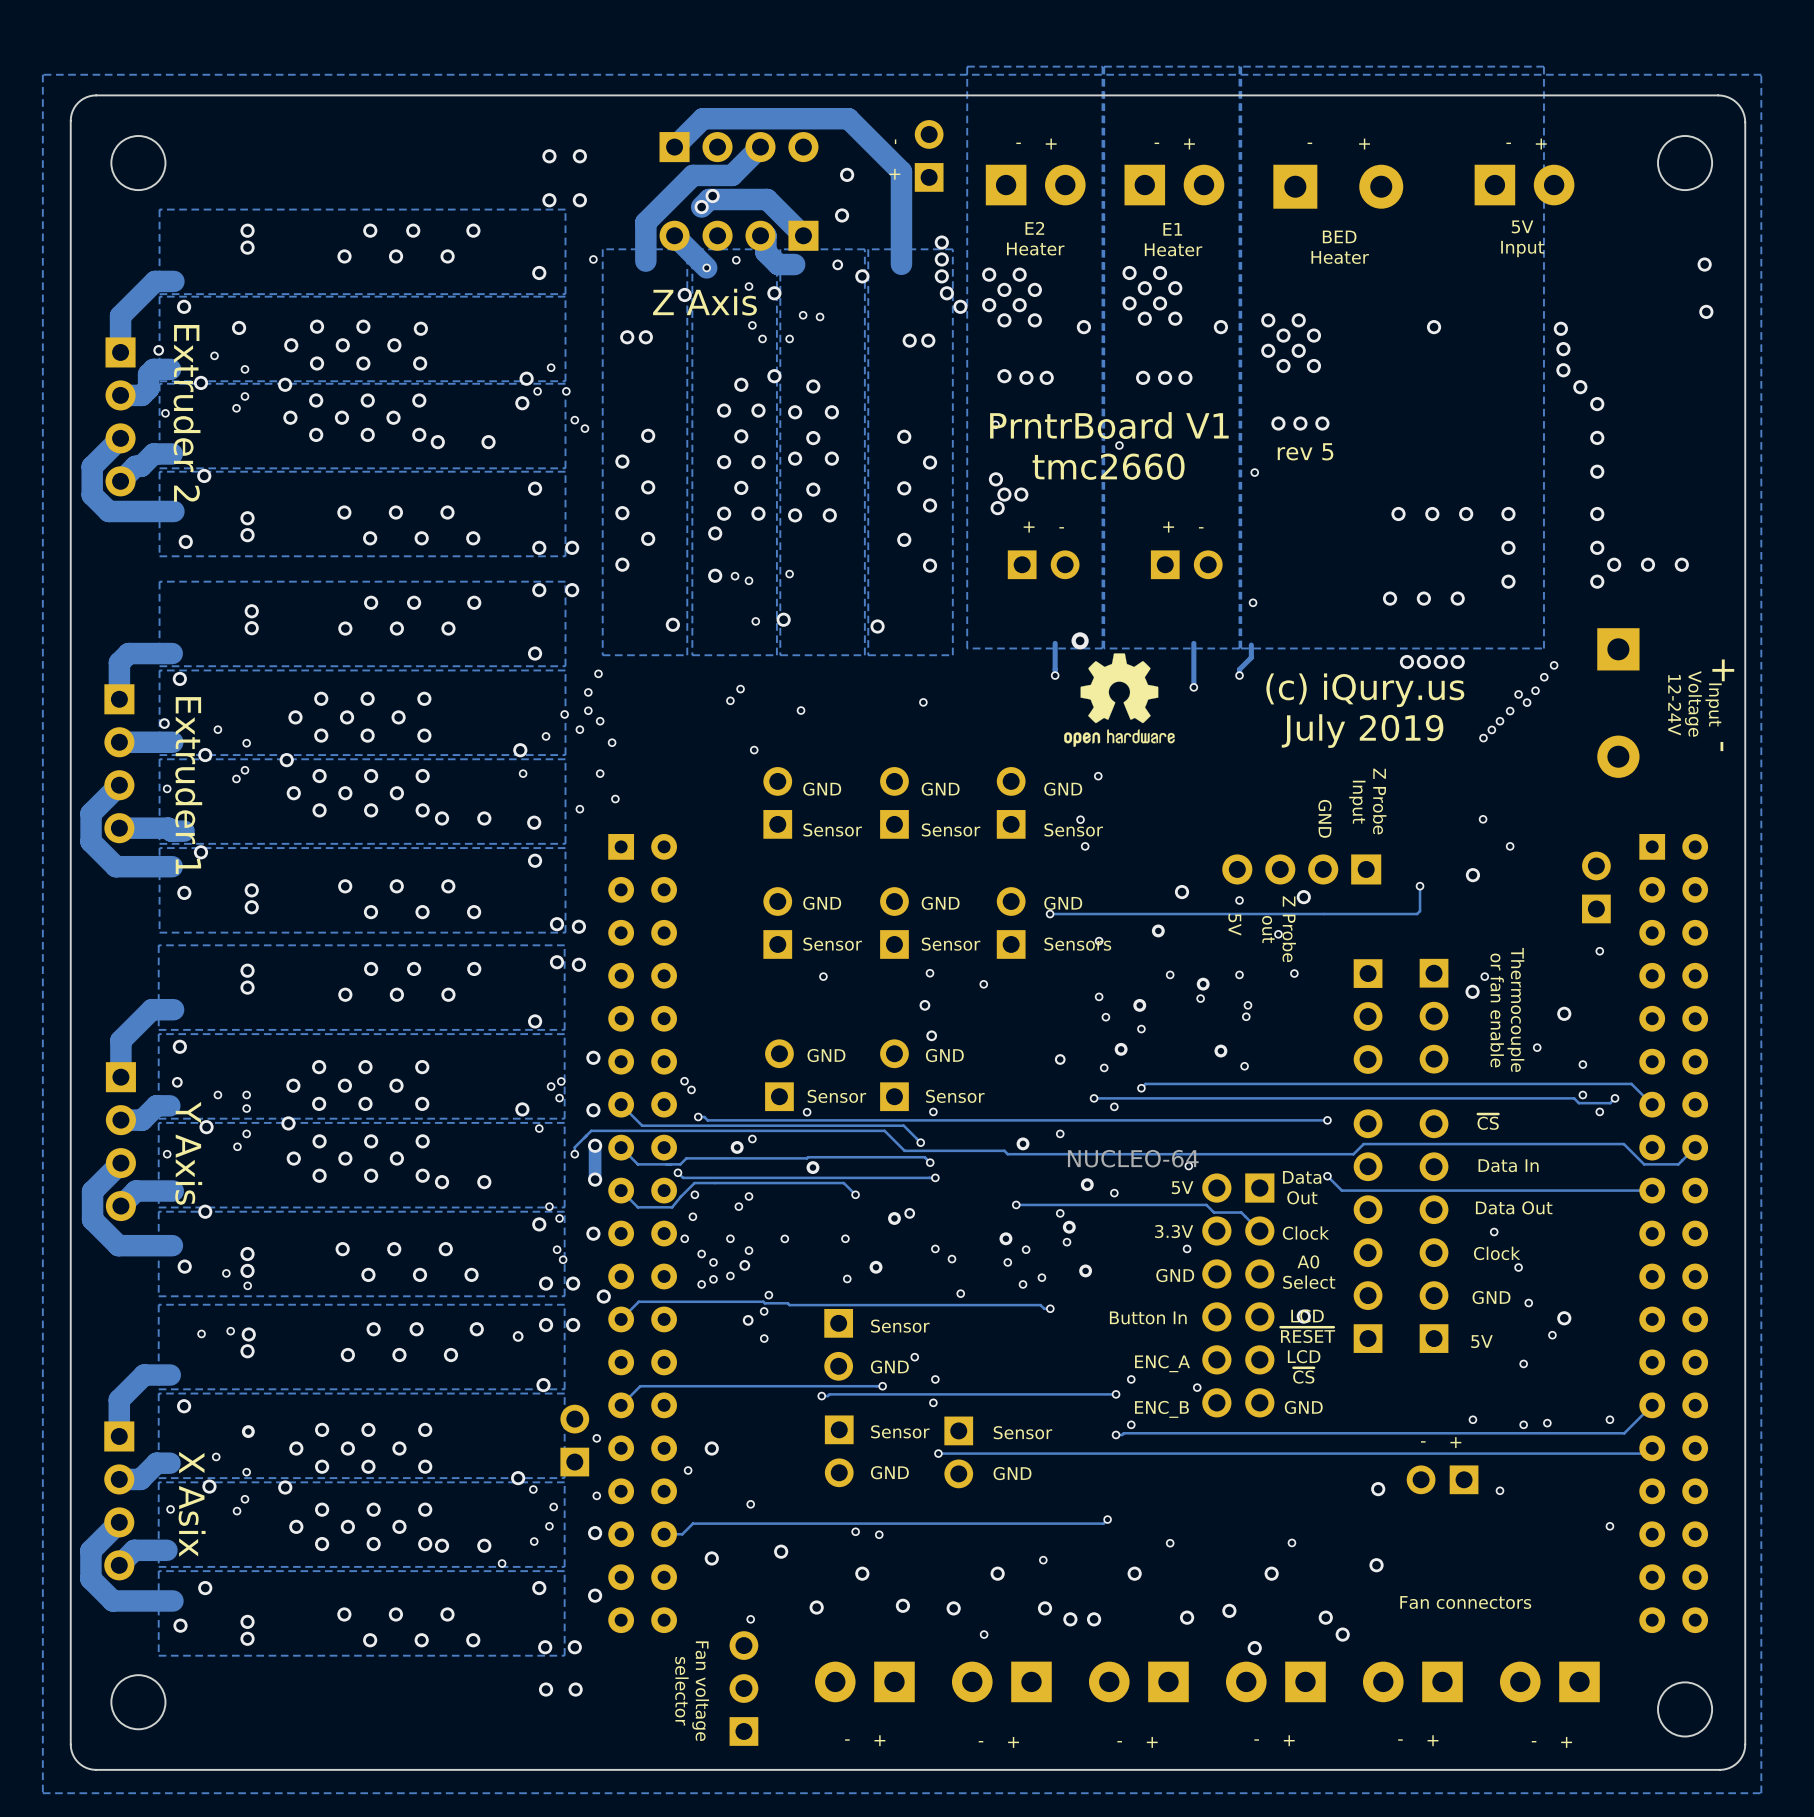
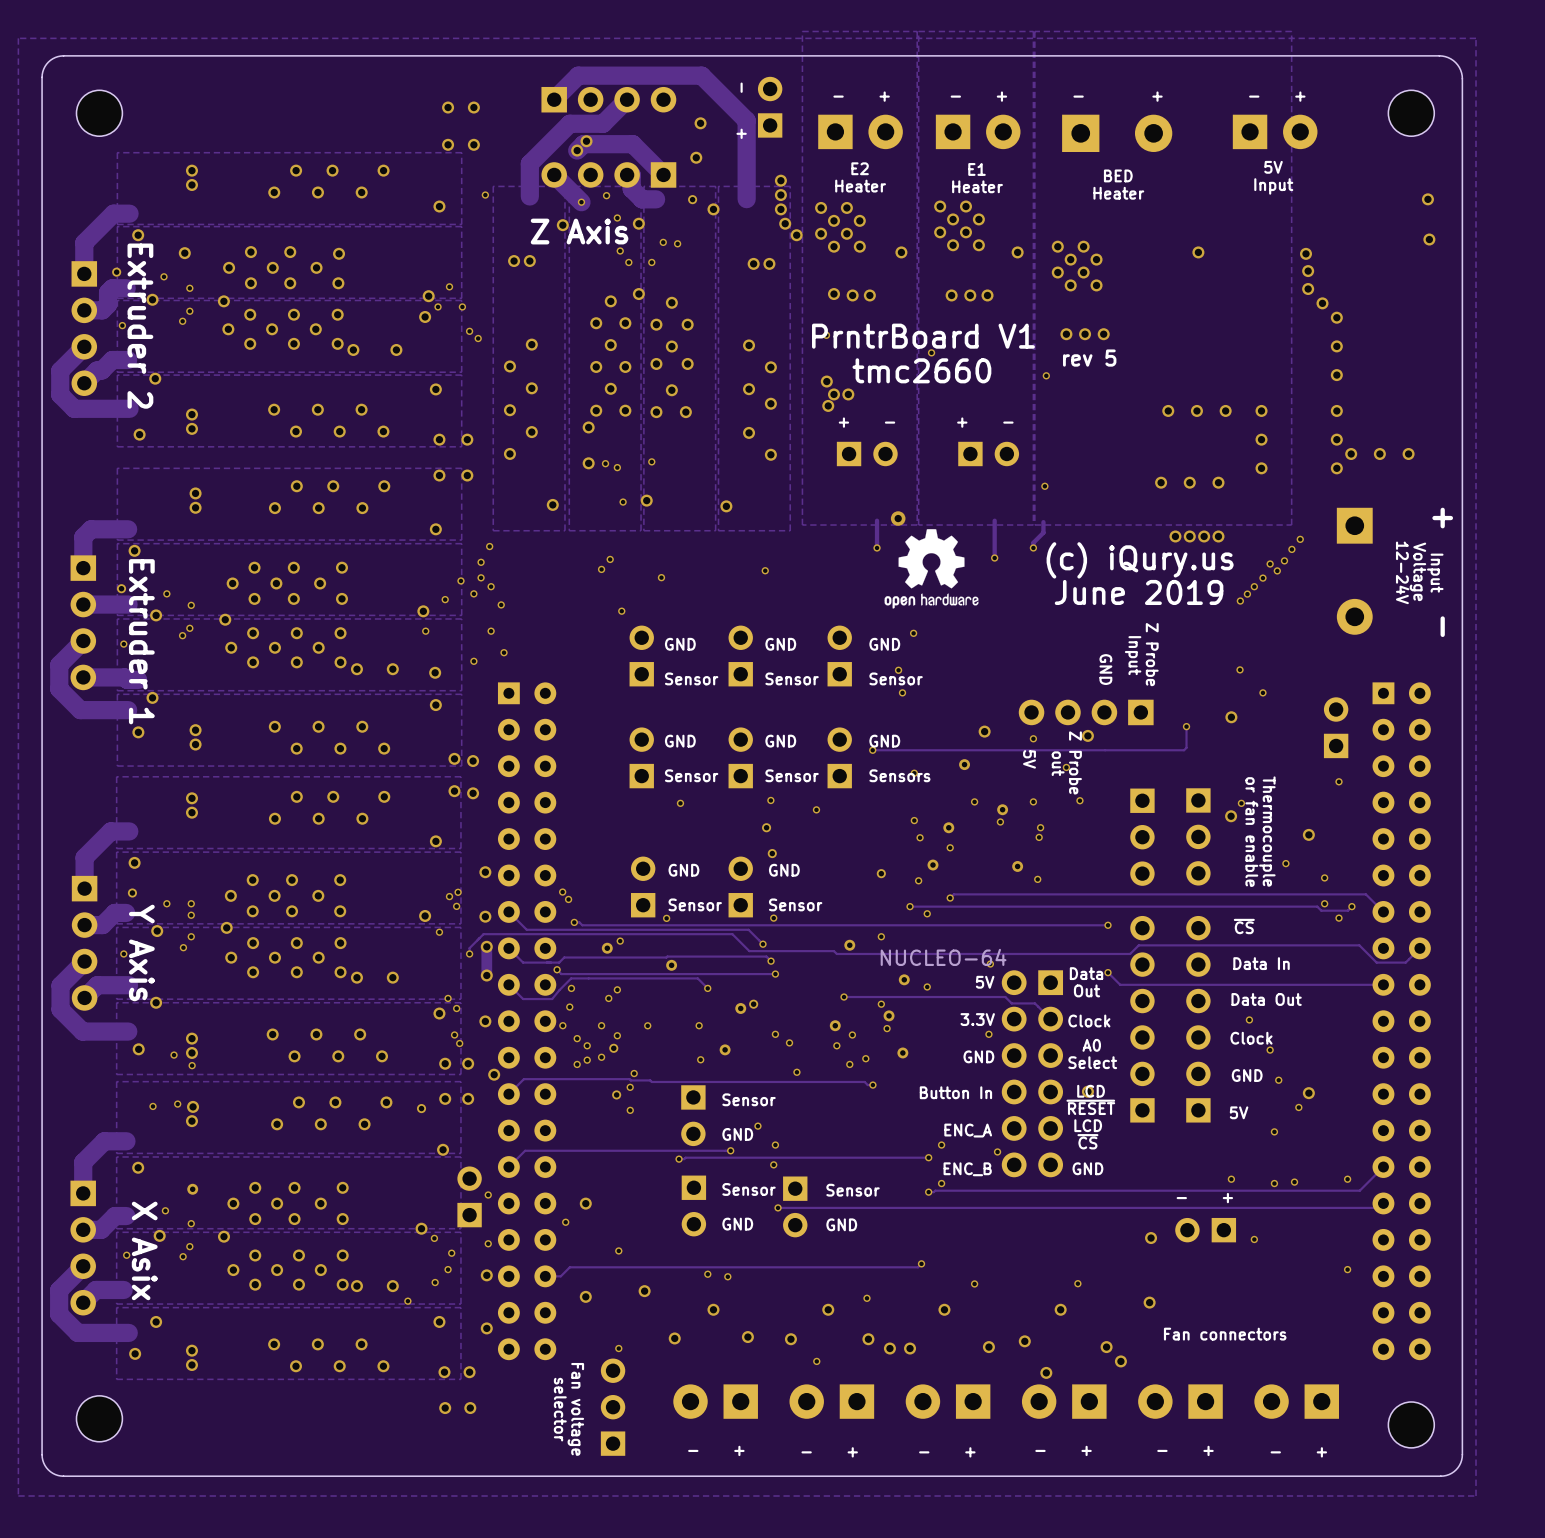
text: July 2019 (1362, 731) -> June 2019 (1139, 592)

